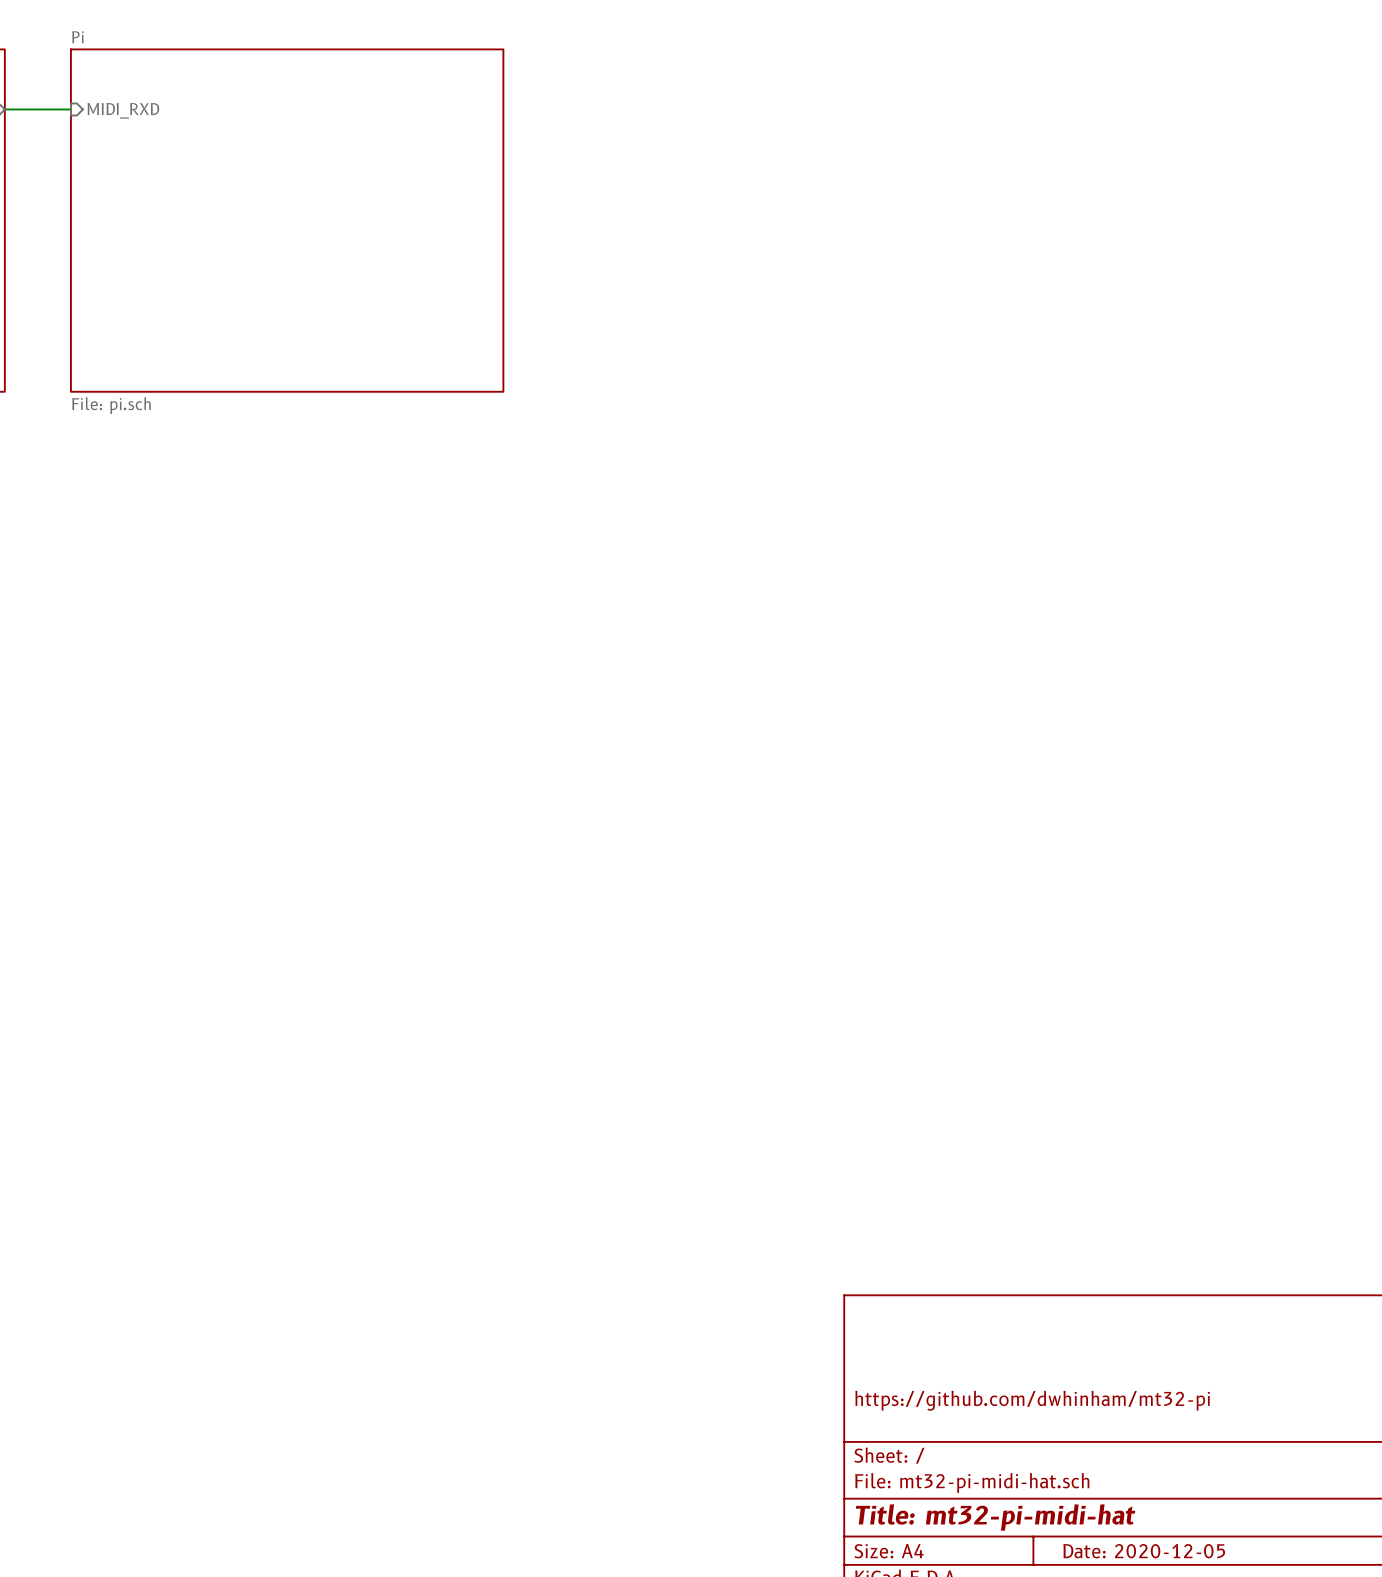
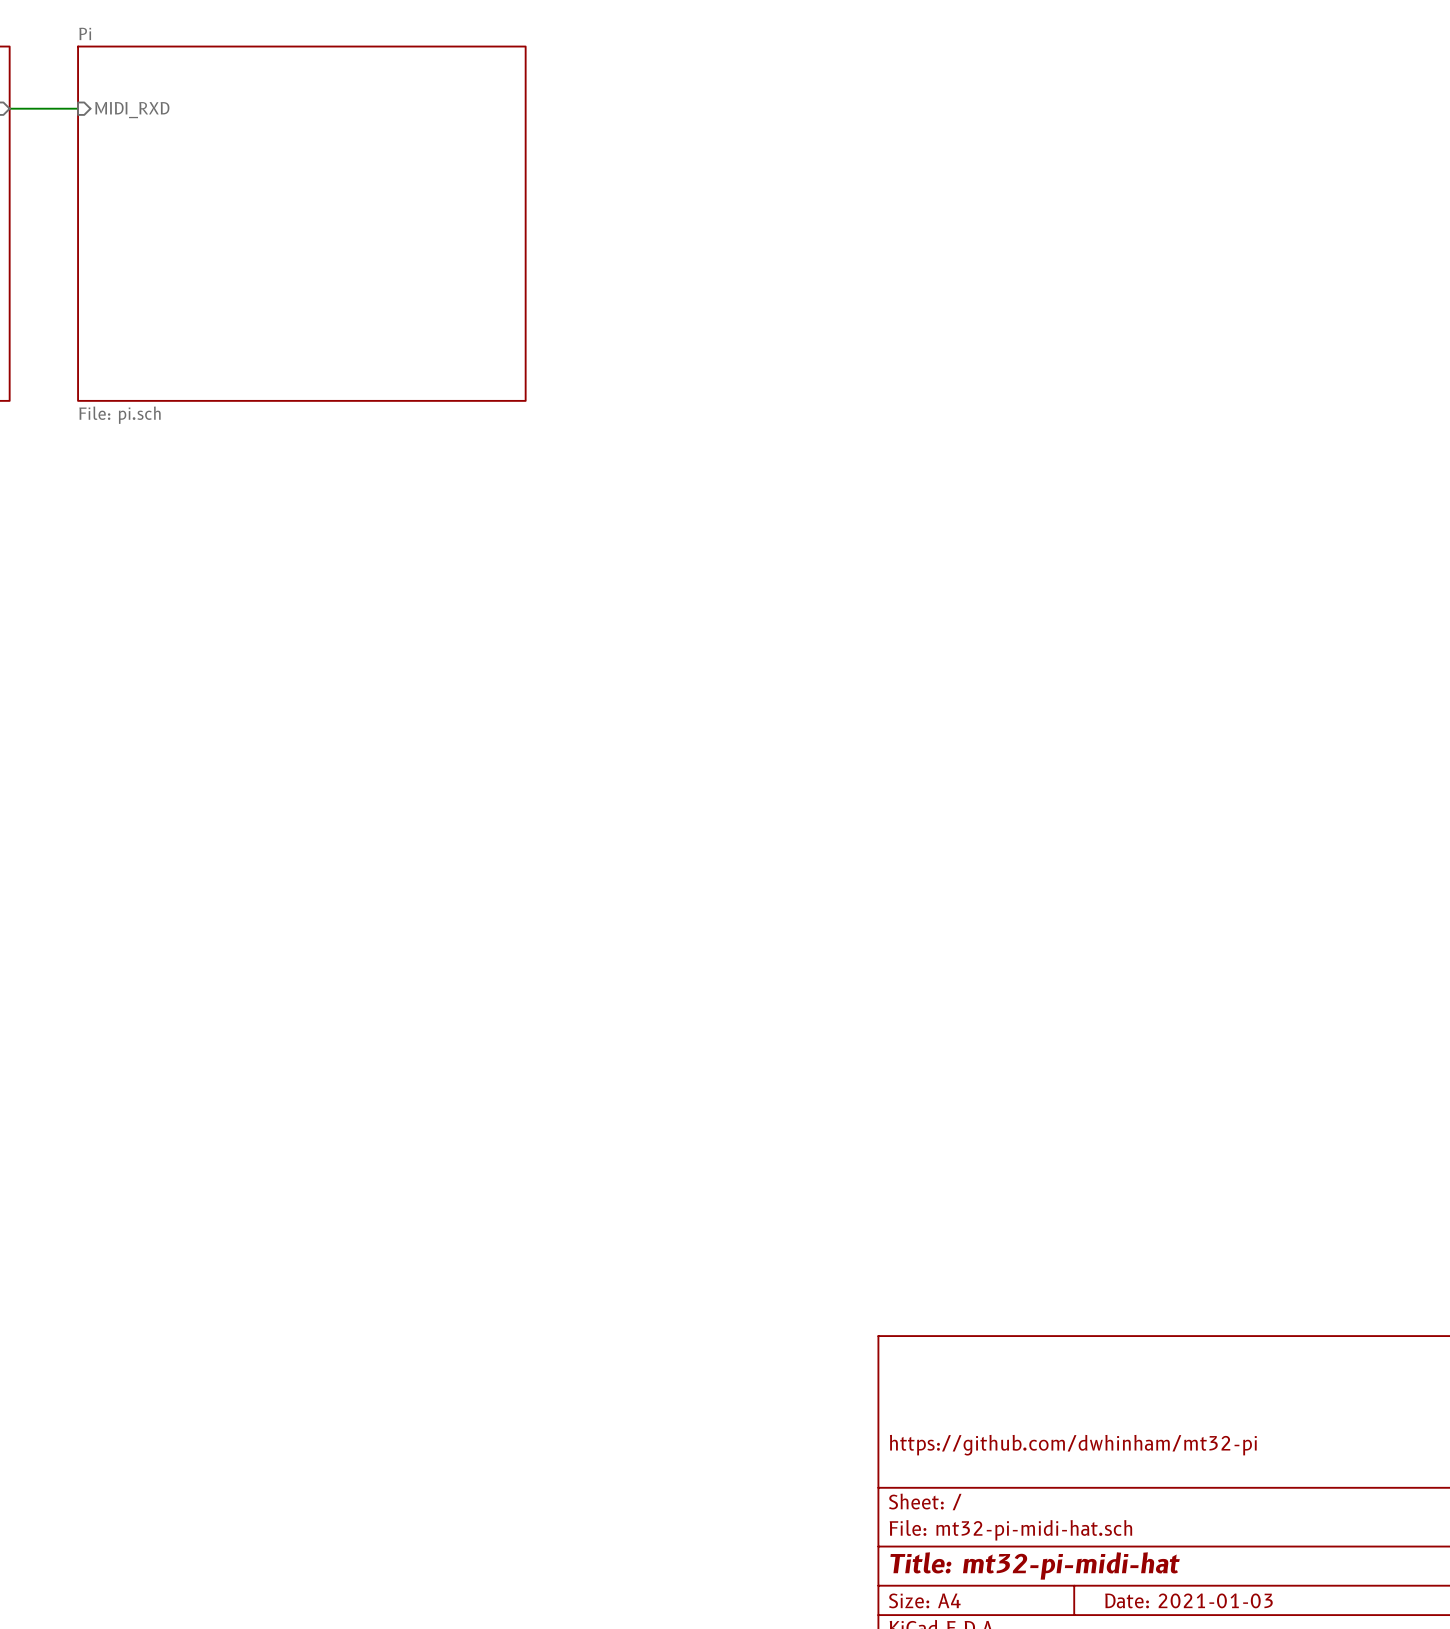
title block: Date: 2020-12-05 (1144, 1551) -> Date: 2021-01-03 (1188, 1600)

